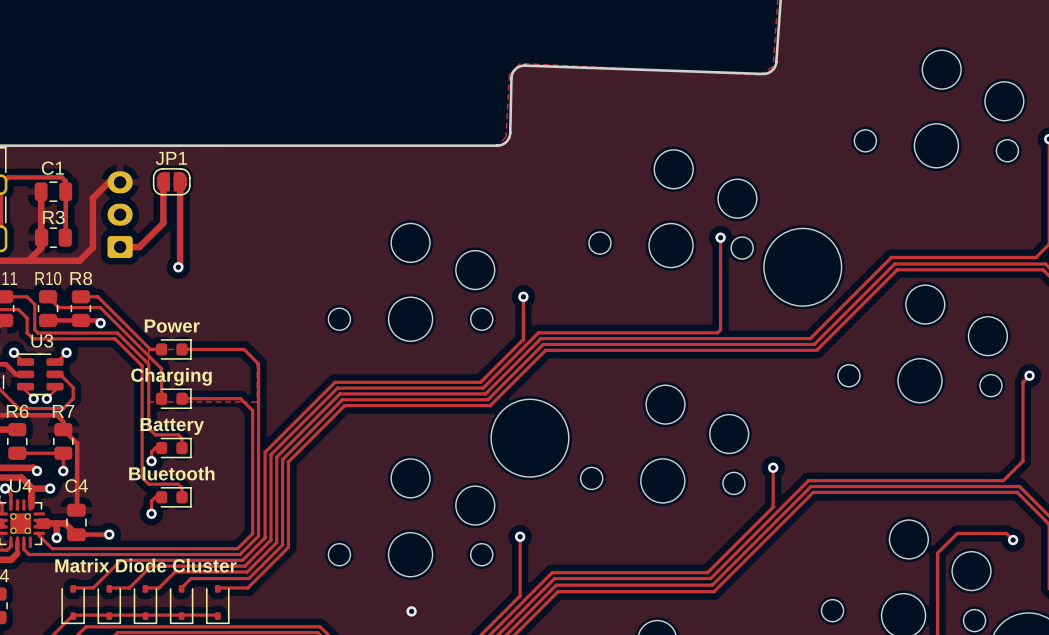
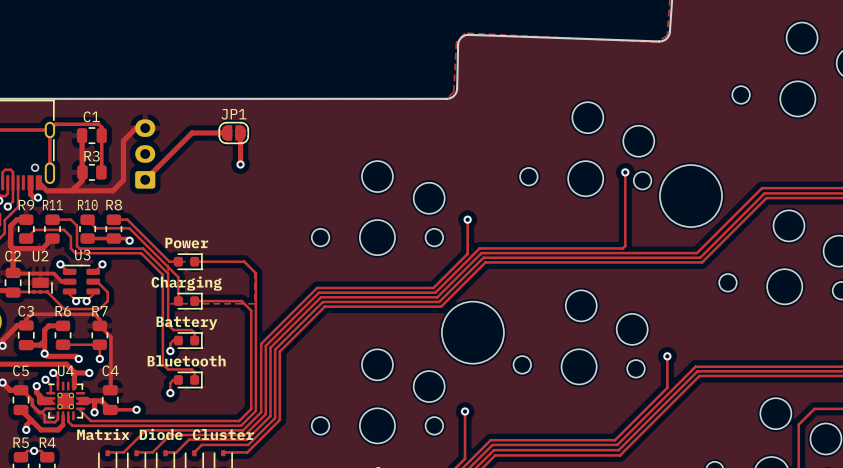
track: (163, 181) (163, 223) (139, 247) (120, 247) -> (227, 132) (192, 132) (145, 179)
JP1 position: (171, 181) -> (233, 132)
track: (180, 181) (180, 265) (178, 267) -> none
track: none -> (240, 132) (240, 164)
via position: (178, 267) -> (240, 164)

